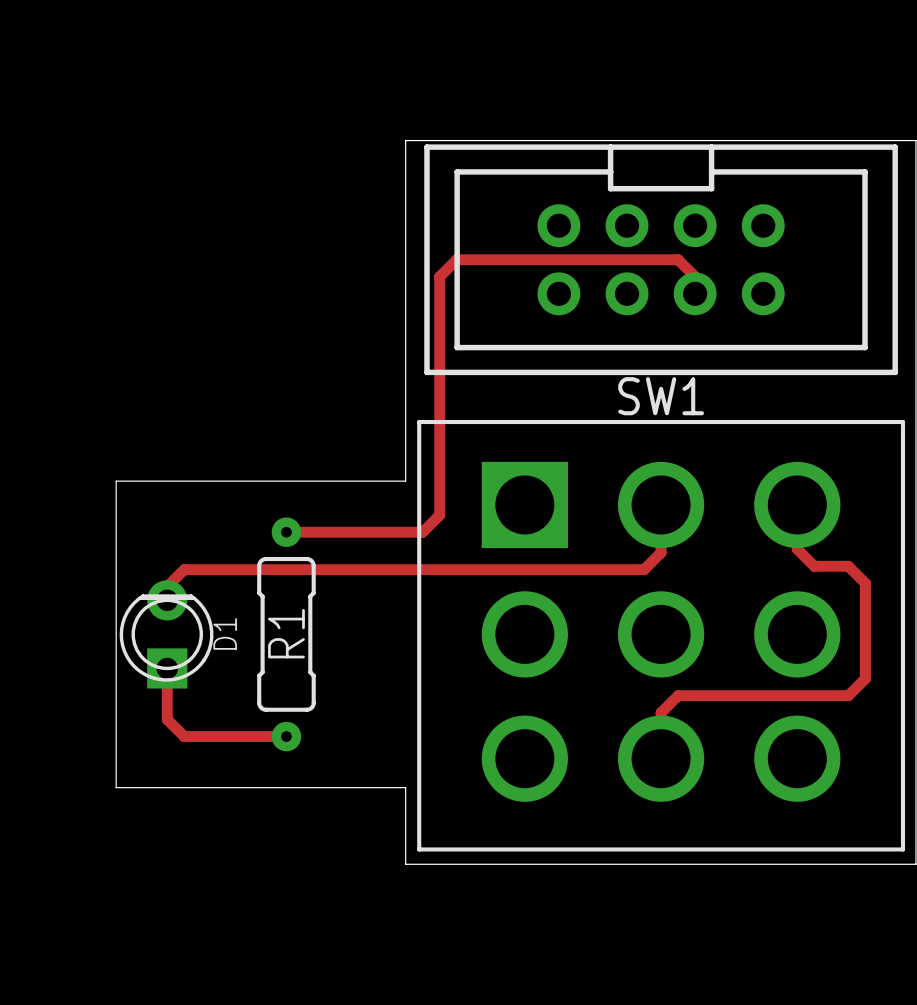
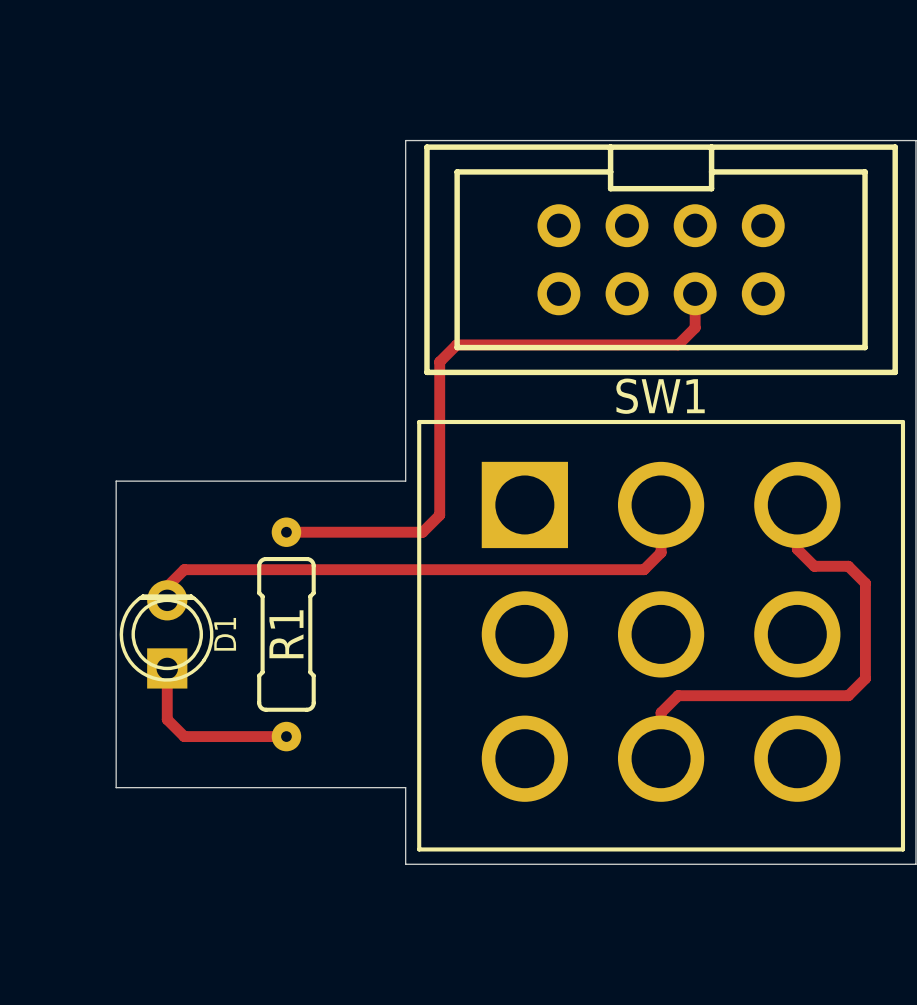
track: (695, 293) (695, 276) (678, 259) (456, 259) (439, 276) (439, 361) -> (695, 293) (695, 327) (678, 344) (456, 344) (439, 361)

